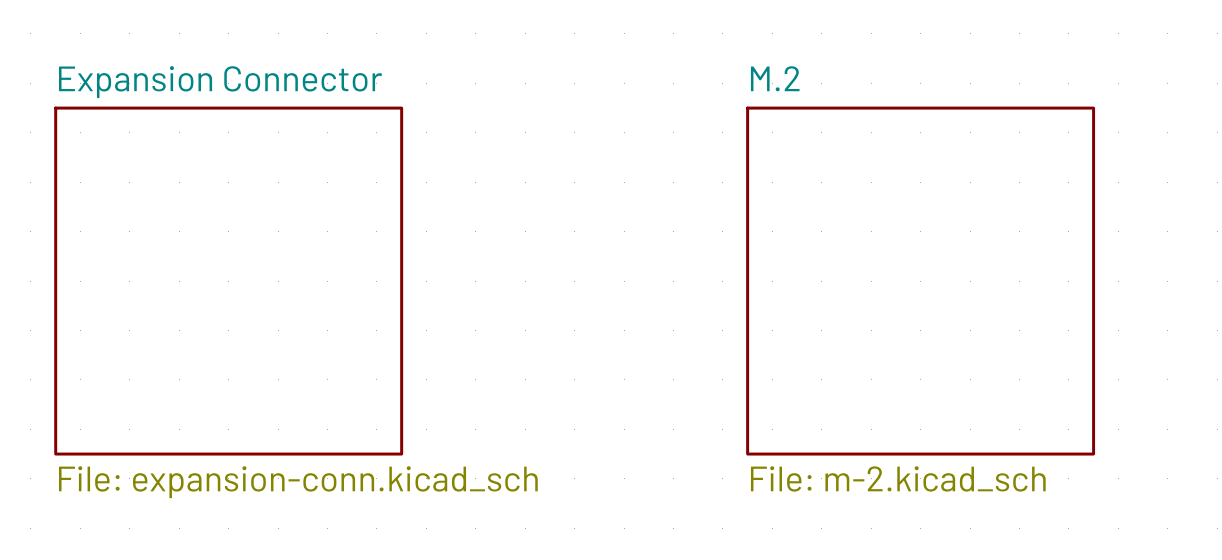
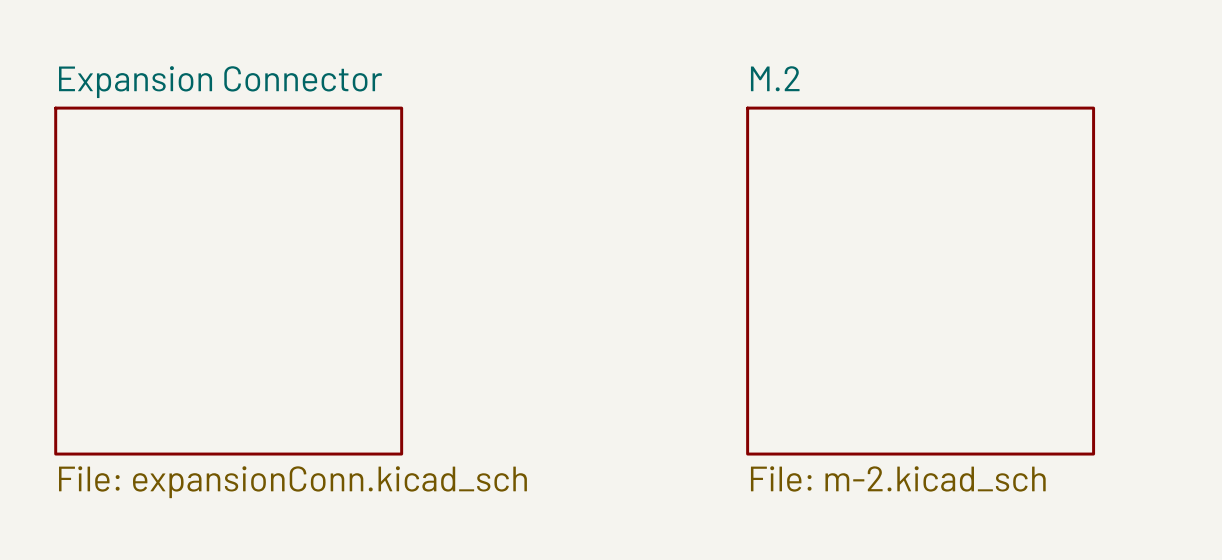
sheet Expansion Connector value: File: expansion-conn.kicad_sch (298, 482) -> File: expansionConn.kicad_sch (292, 482)

